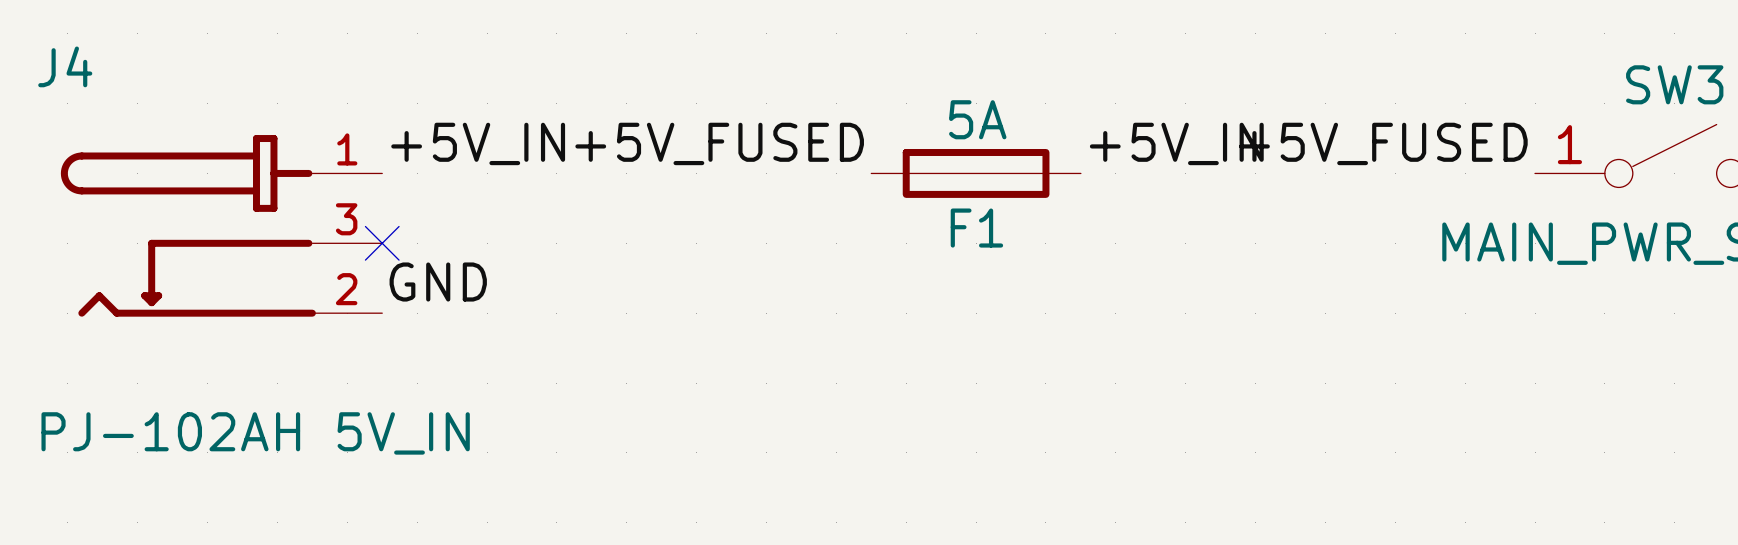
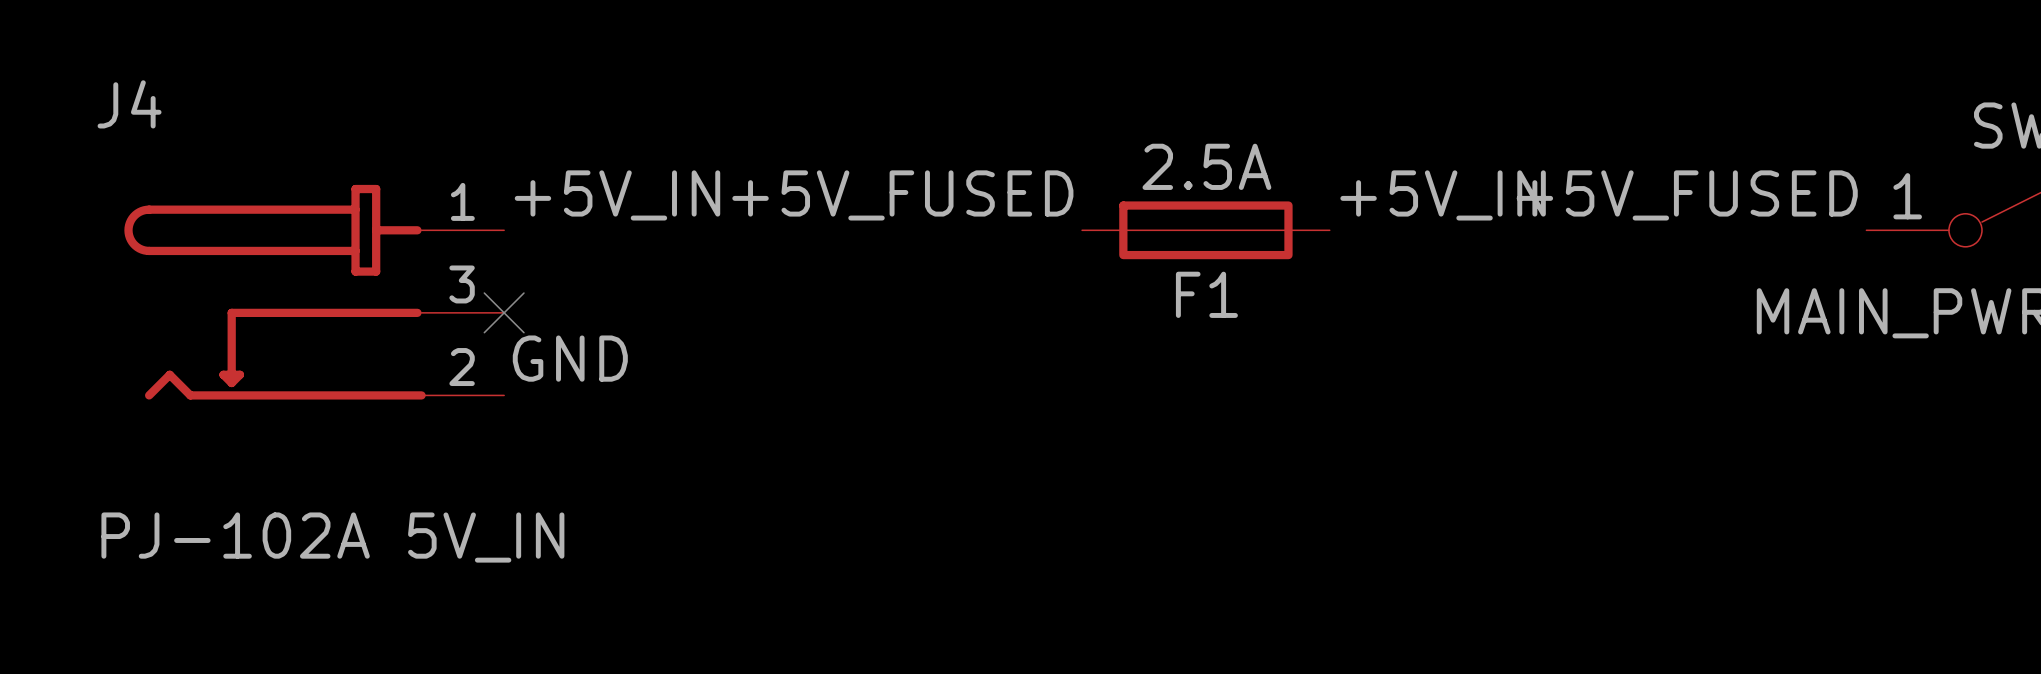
F1 value: 5A (977, 119) -> 2.5A (1206, 166)
J4 value: PJ-102AH 5V_IN (255, 433) -> PJ-102A 5V_IN (332, 537)

